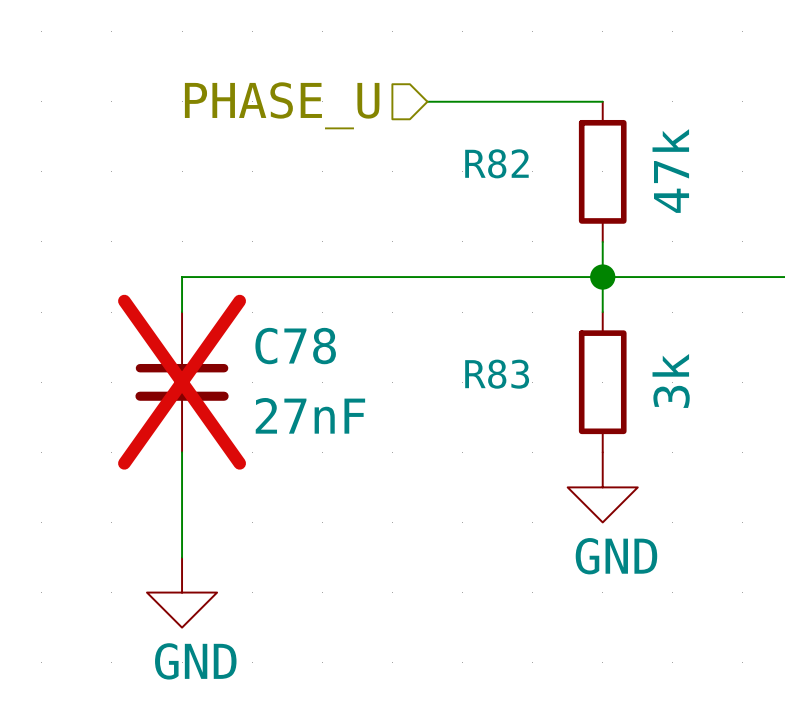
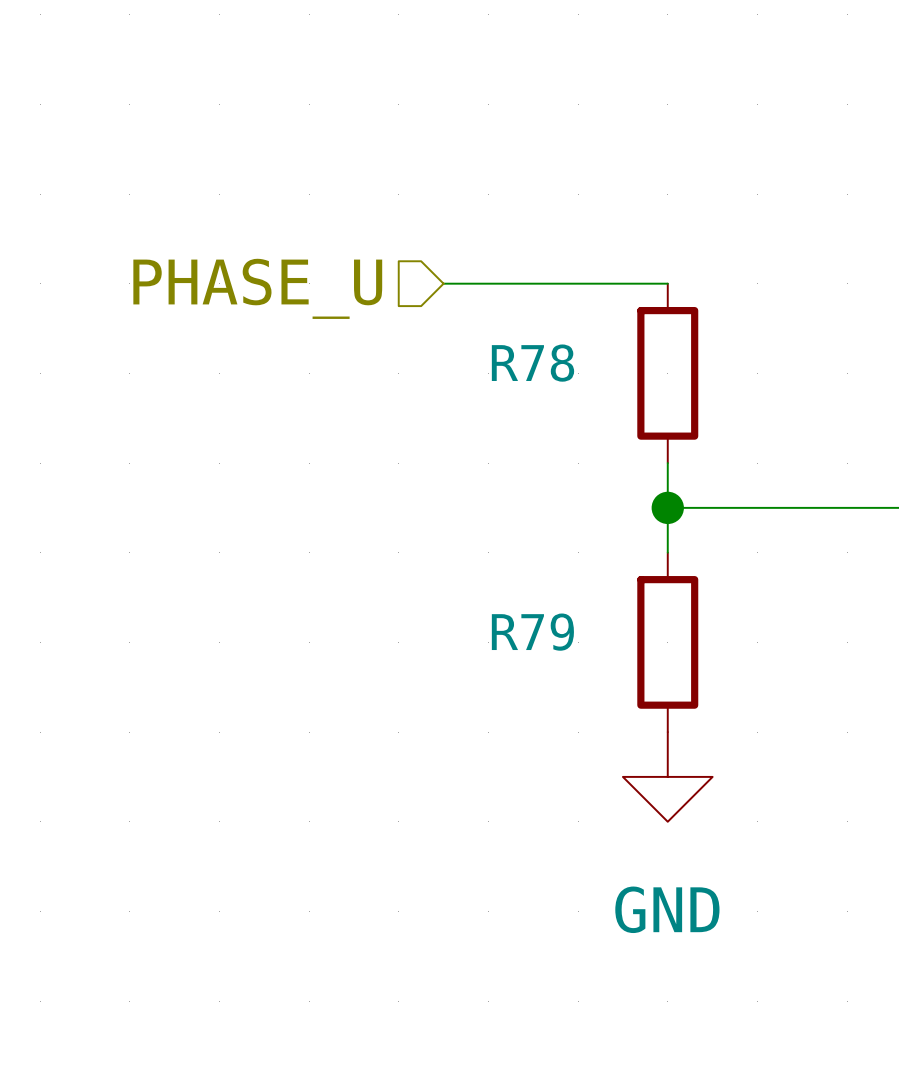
R82 name: R82 (496, 163) -> R78 (532, 363)
R82 value: 47k (670, 171) -> none
wire: (602, 277) (182, 277) (182, 312) -> none
R83 name: R83 (497, 374) -> R79 (532, 632)
R83 value: 3k (671, 380) -> none
C78: 27nF (182, 382) -> none
wire: (182, 452) (182, 557) -> none
power symbol text position: GND (616, 556) -> GND (667, 909)
power symbol: GND (182, 592) -> none

